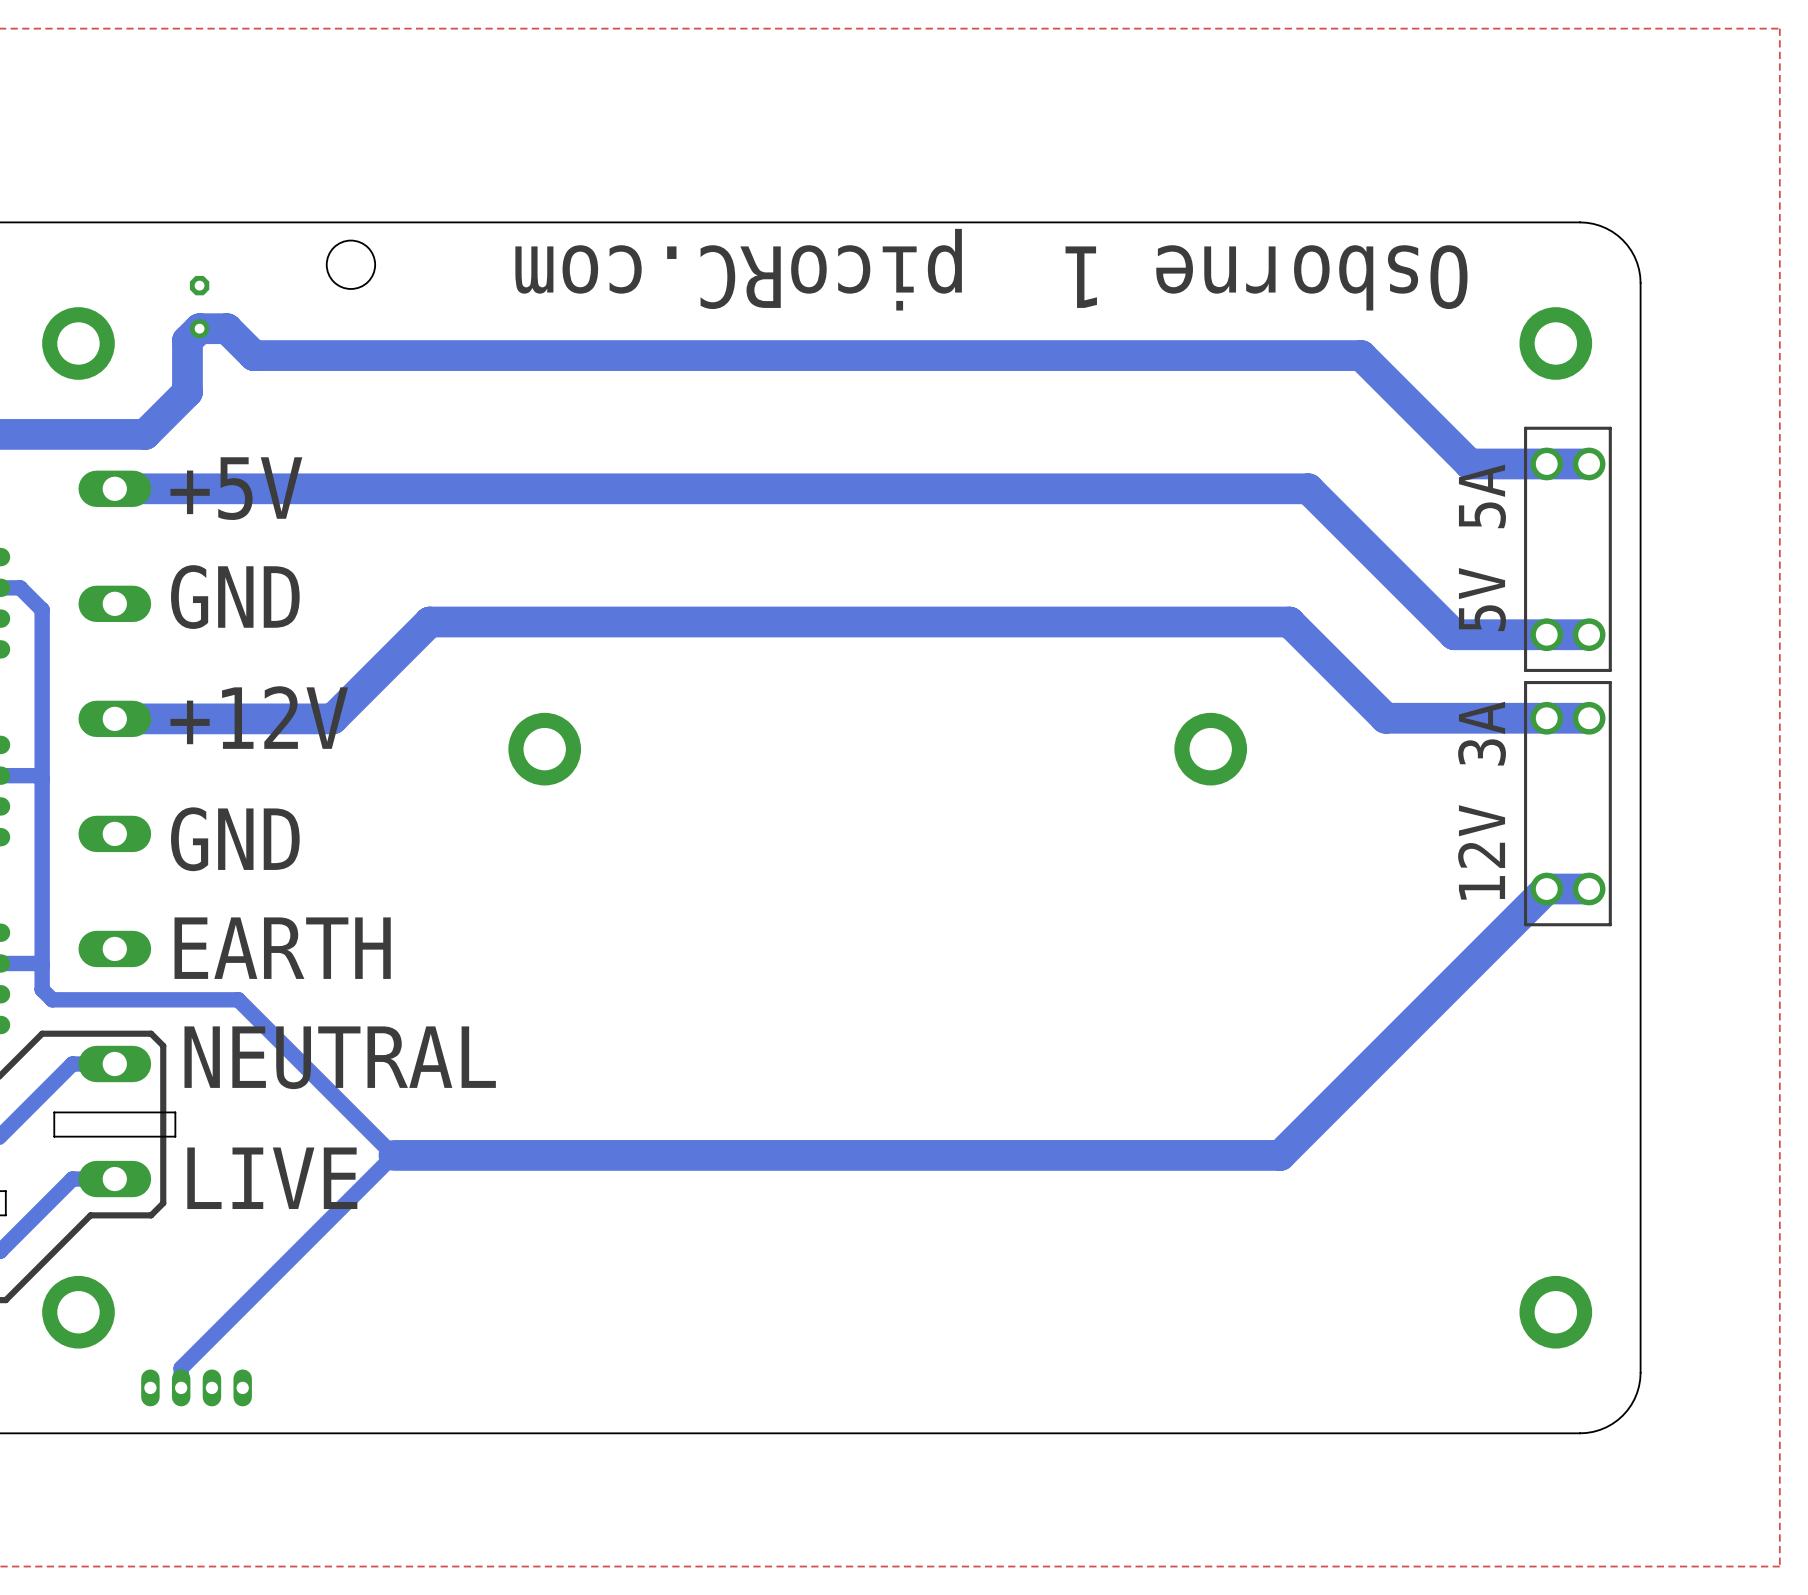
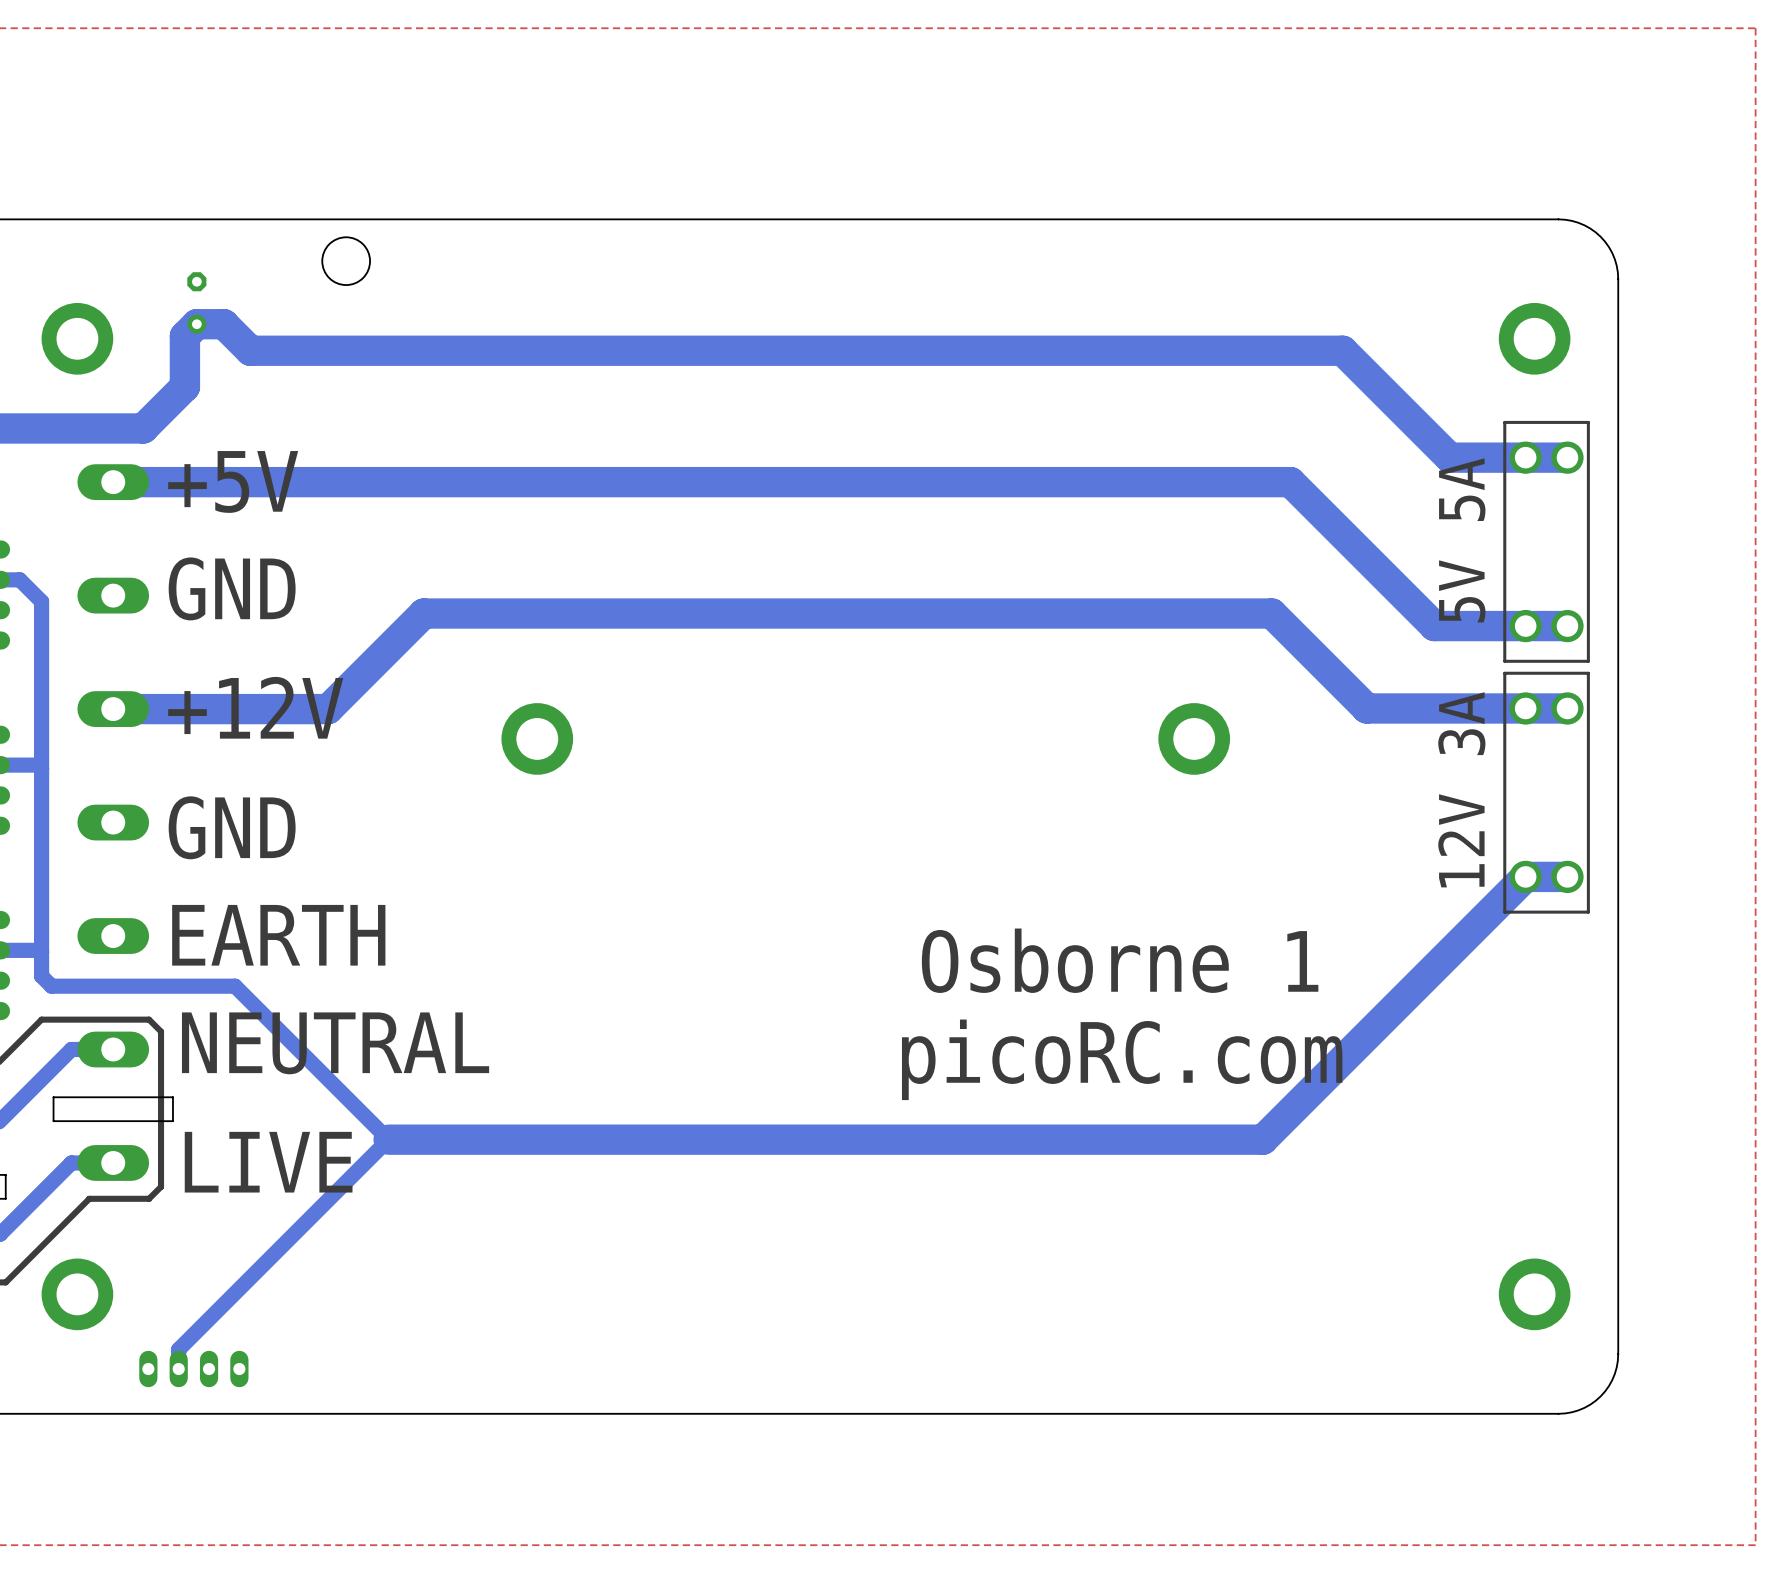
text: Osborne 1 picoRC.com (991, 269) -> none
text: none -> Osborne 1 (1120, 960)
text: none -> picoRC.com (1122, 1059)

